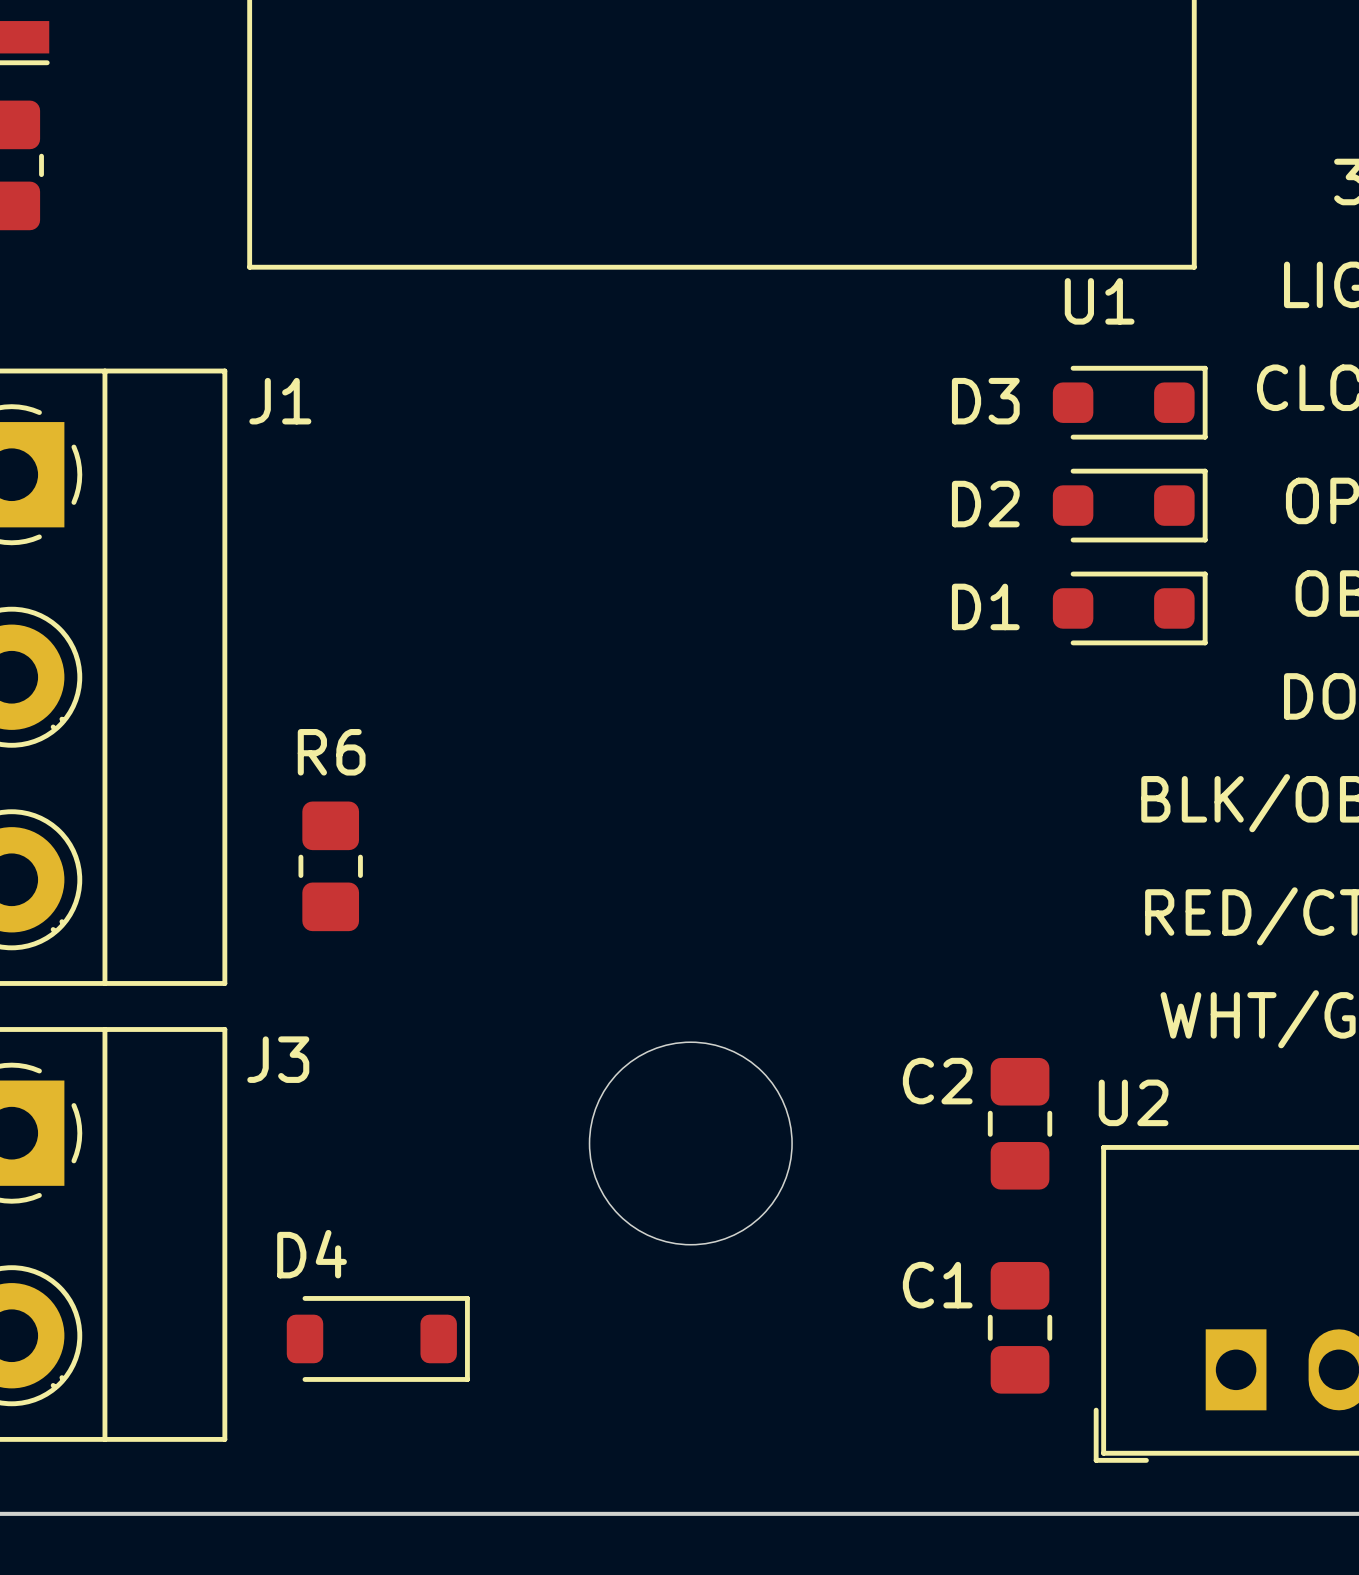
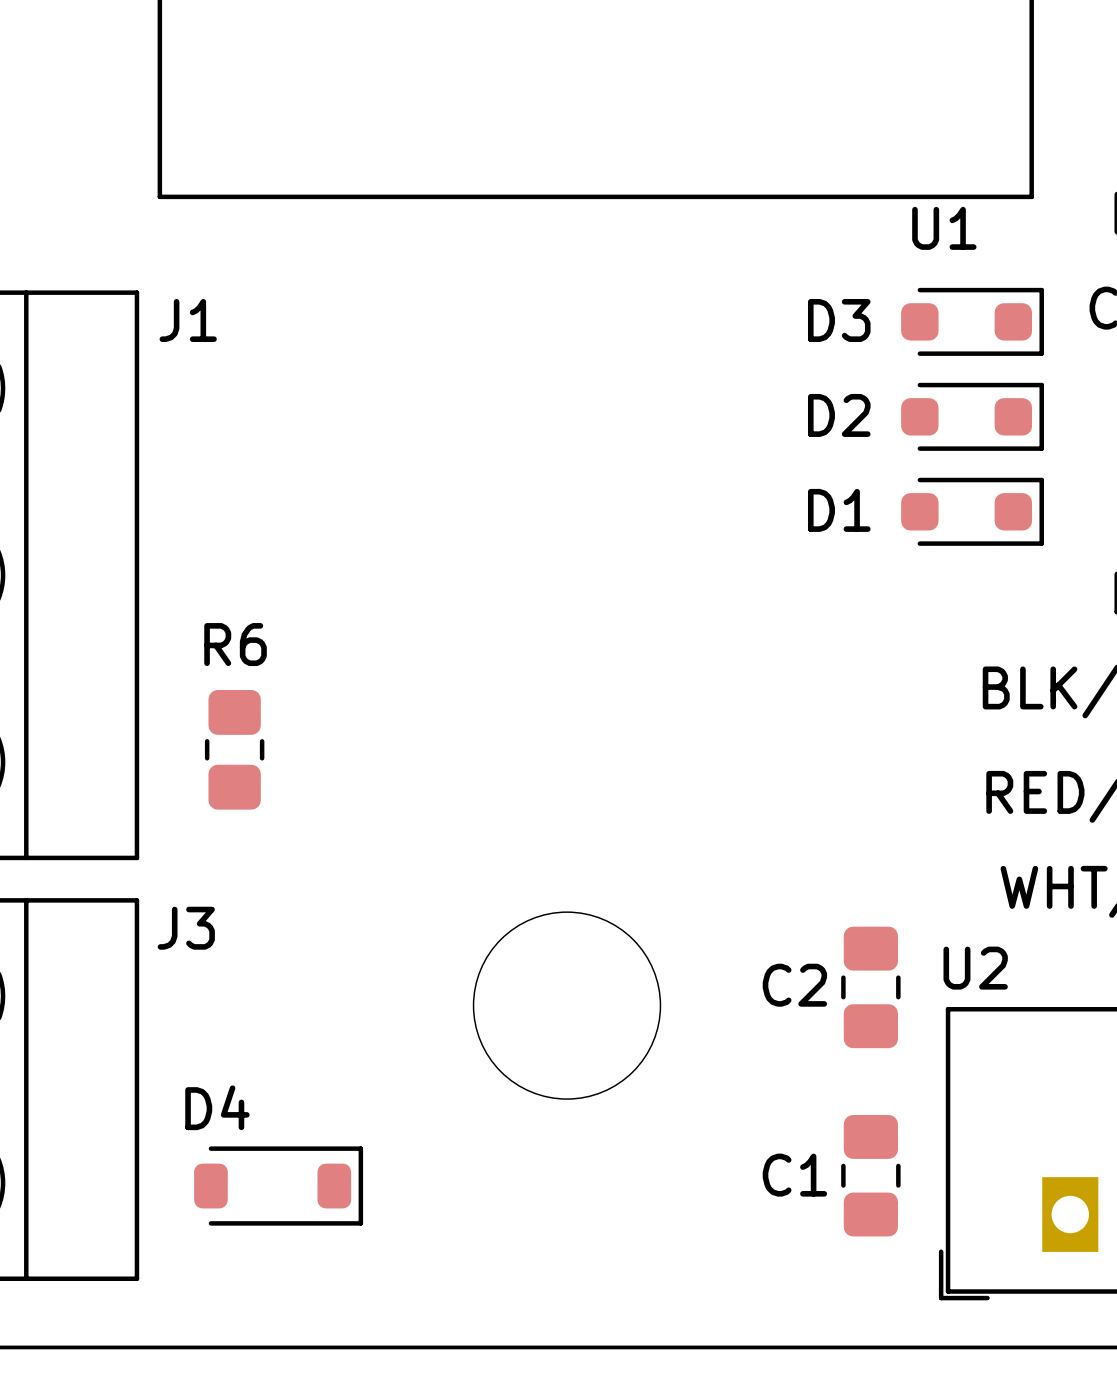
C2 name position: C2 (937, 1081) -> C2 (794, 985)
C1 name position: C1 (937, 1285) -> C1 (794, 1175)

